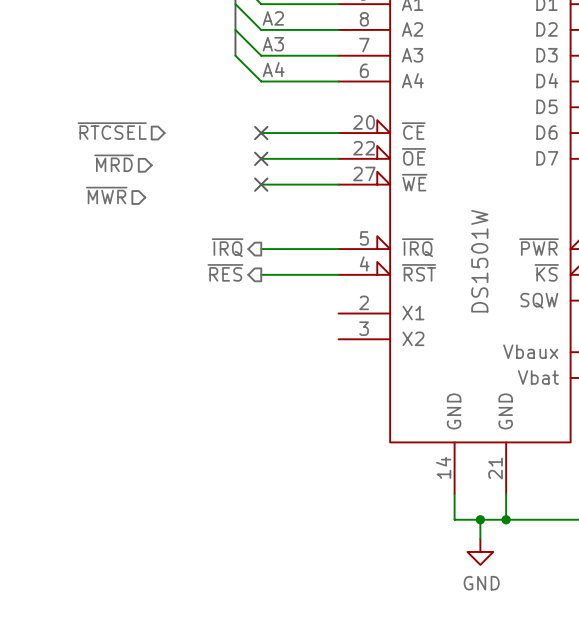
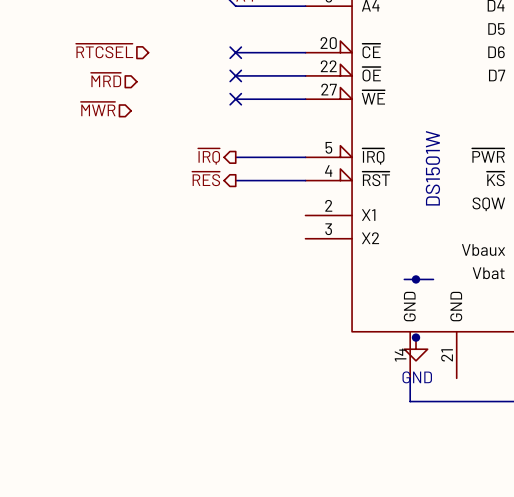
wire: none -> (404, 279) (433, 279)
junction: none -> (415, 279)
junction: none -> (415, 337)
wire: (506, 493) (506, 519) -> none
wire: (480, 519) (480, 539) -> none
junction: (480, 519) -> none
junction: (506, 519) -> none
power symbol position: GND (480, 551) -> GND (415, 349)

